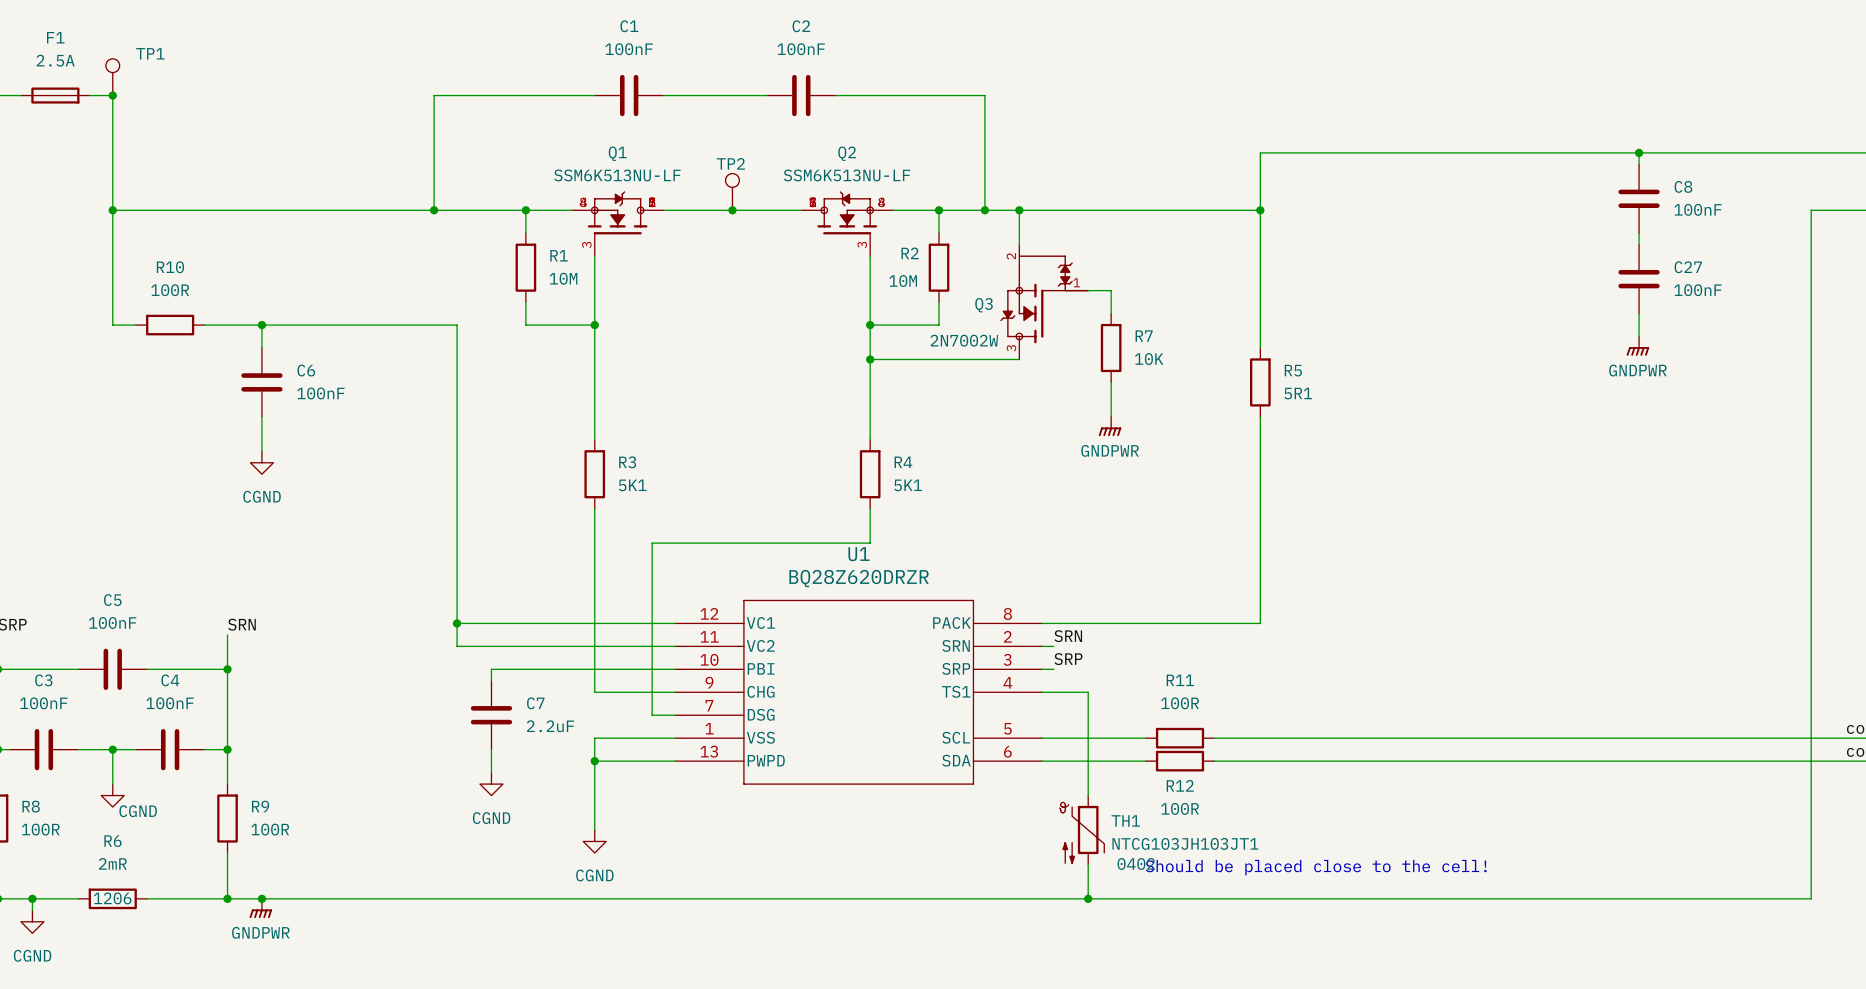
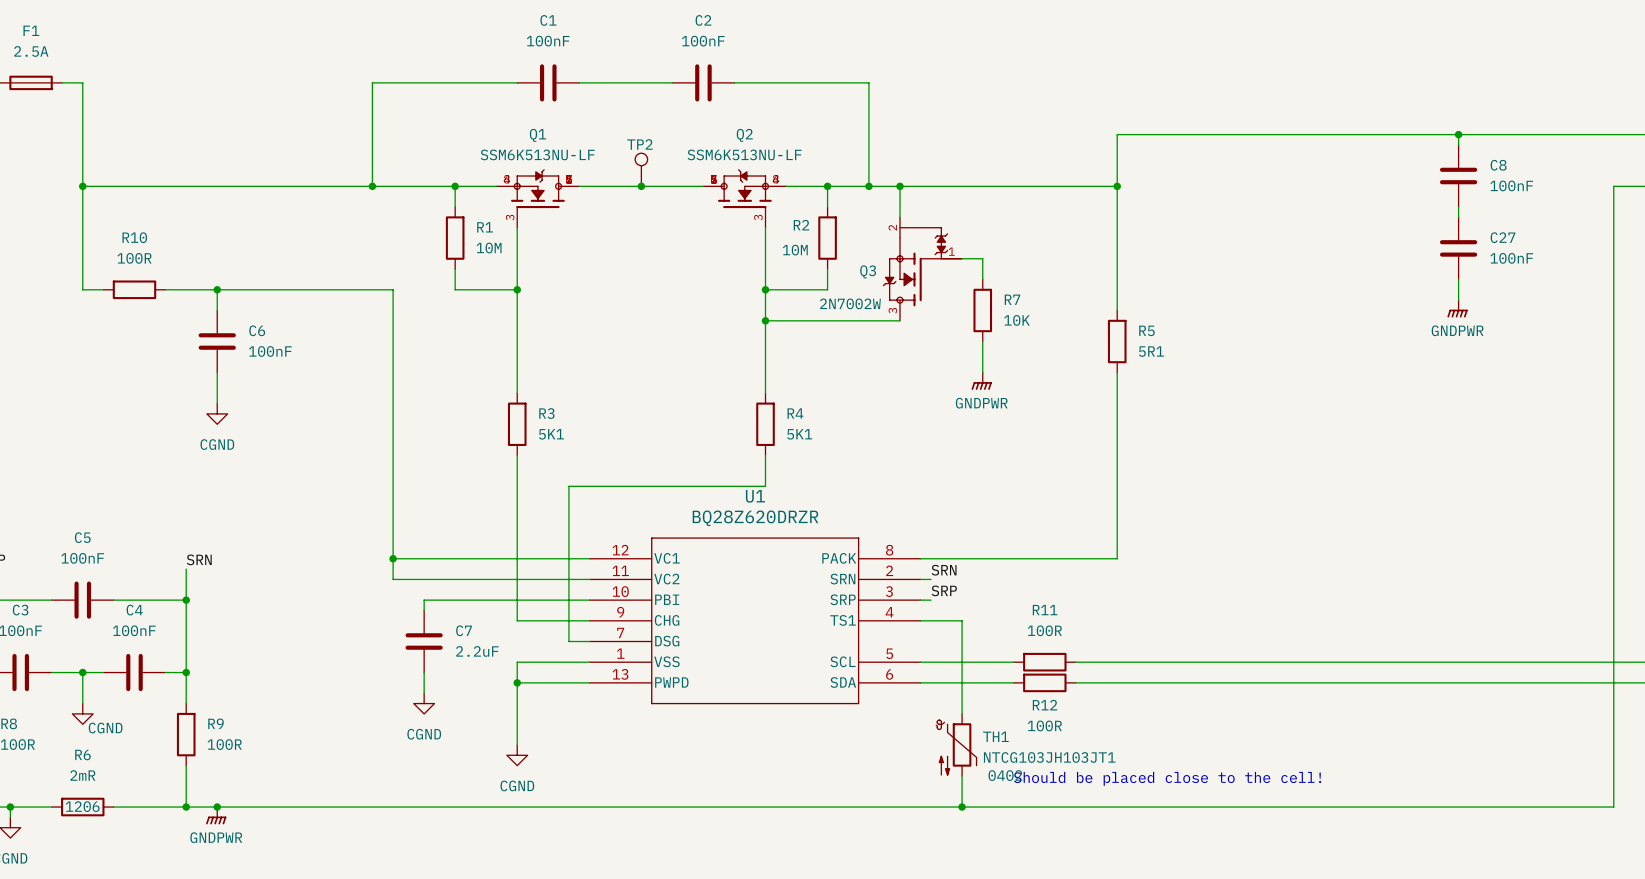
TP1: (112, 77) -> none
junction: (112, 95) -> none

